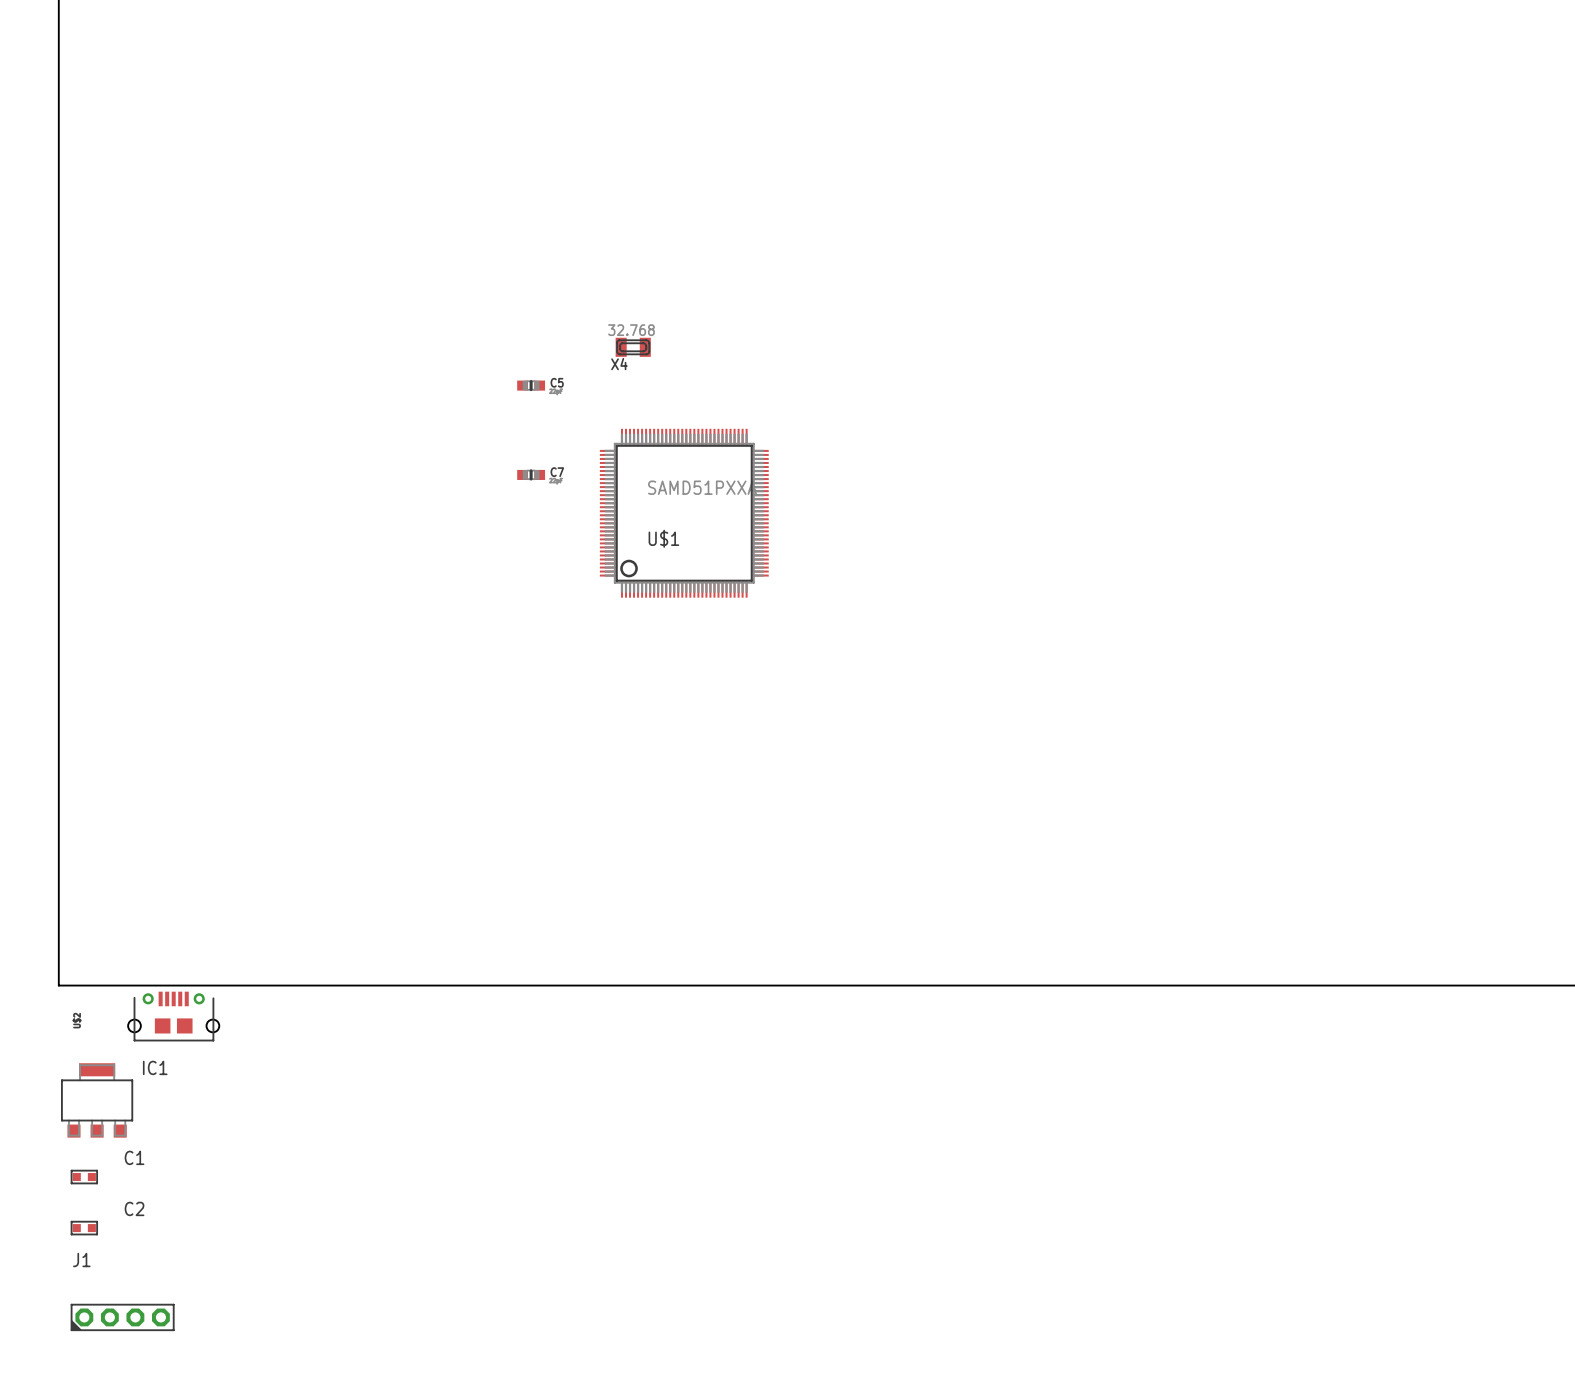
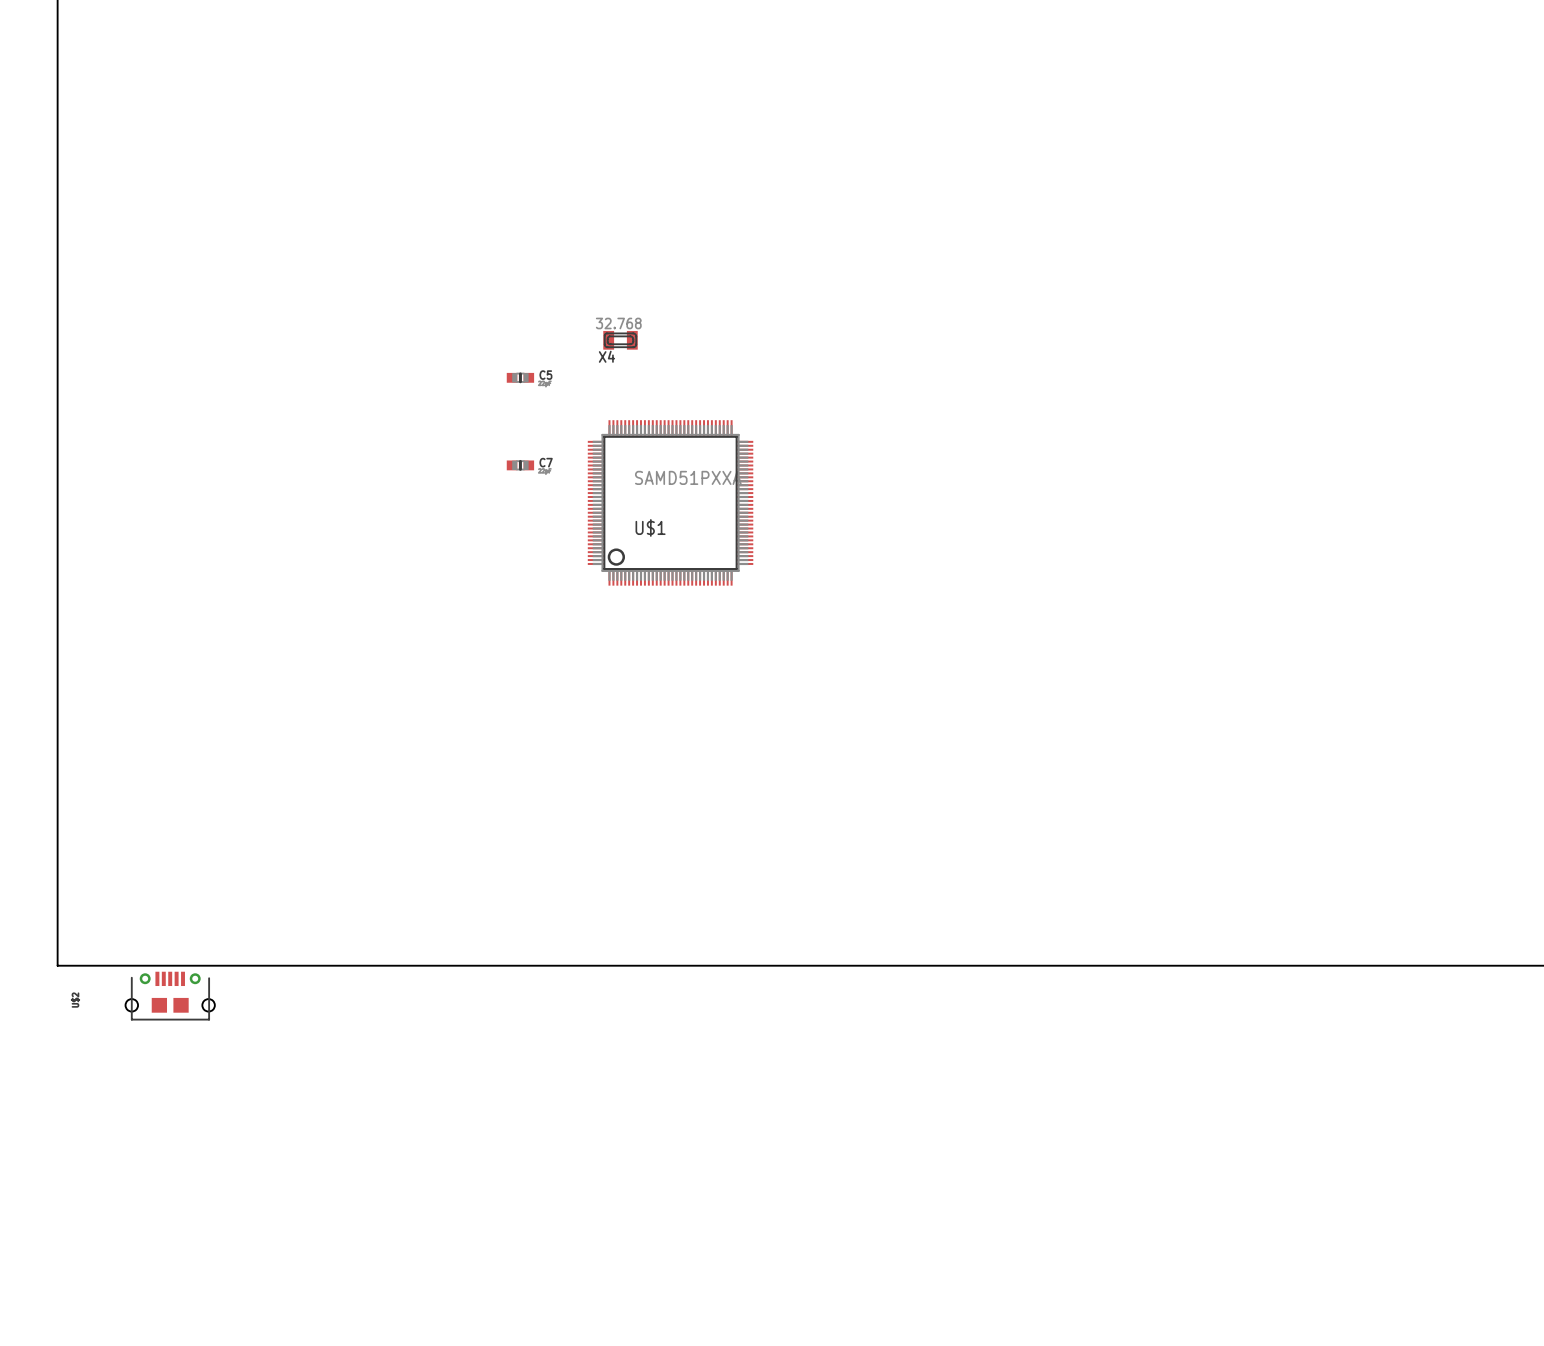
IC1: (97, 1100) -> none
C1: (84, 1177) -> none
C2: (84, 1228) -> none
J1: (122, 1317) -> none

